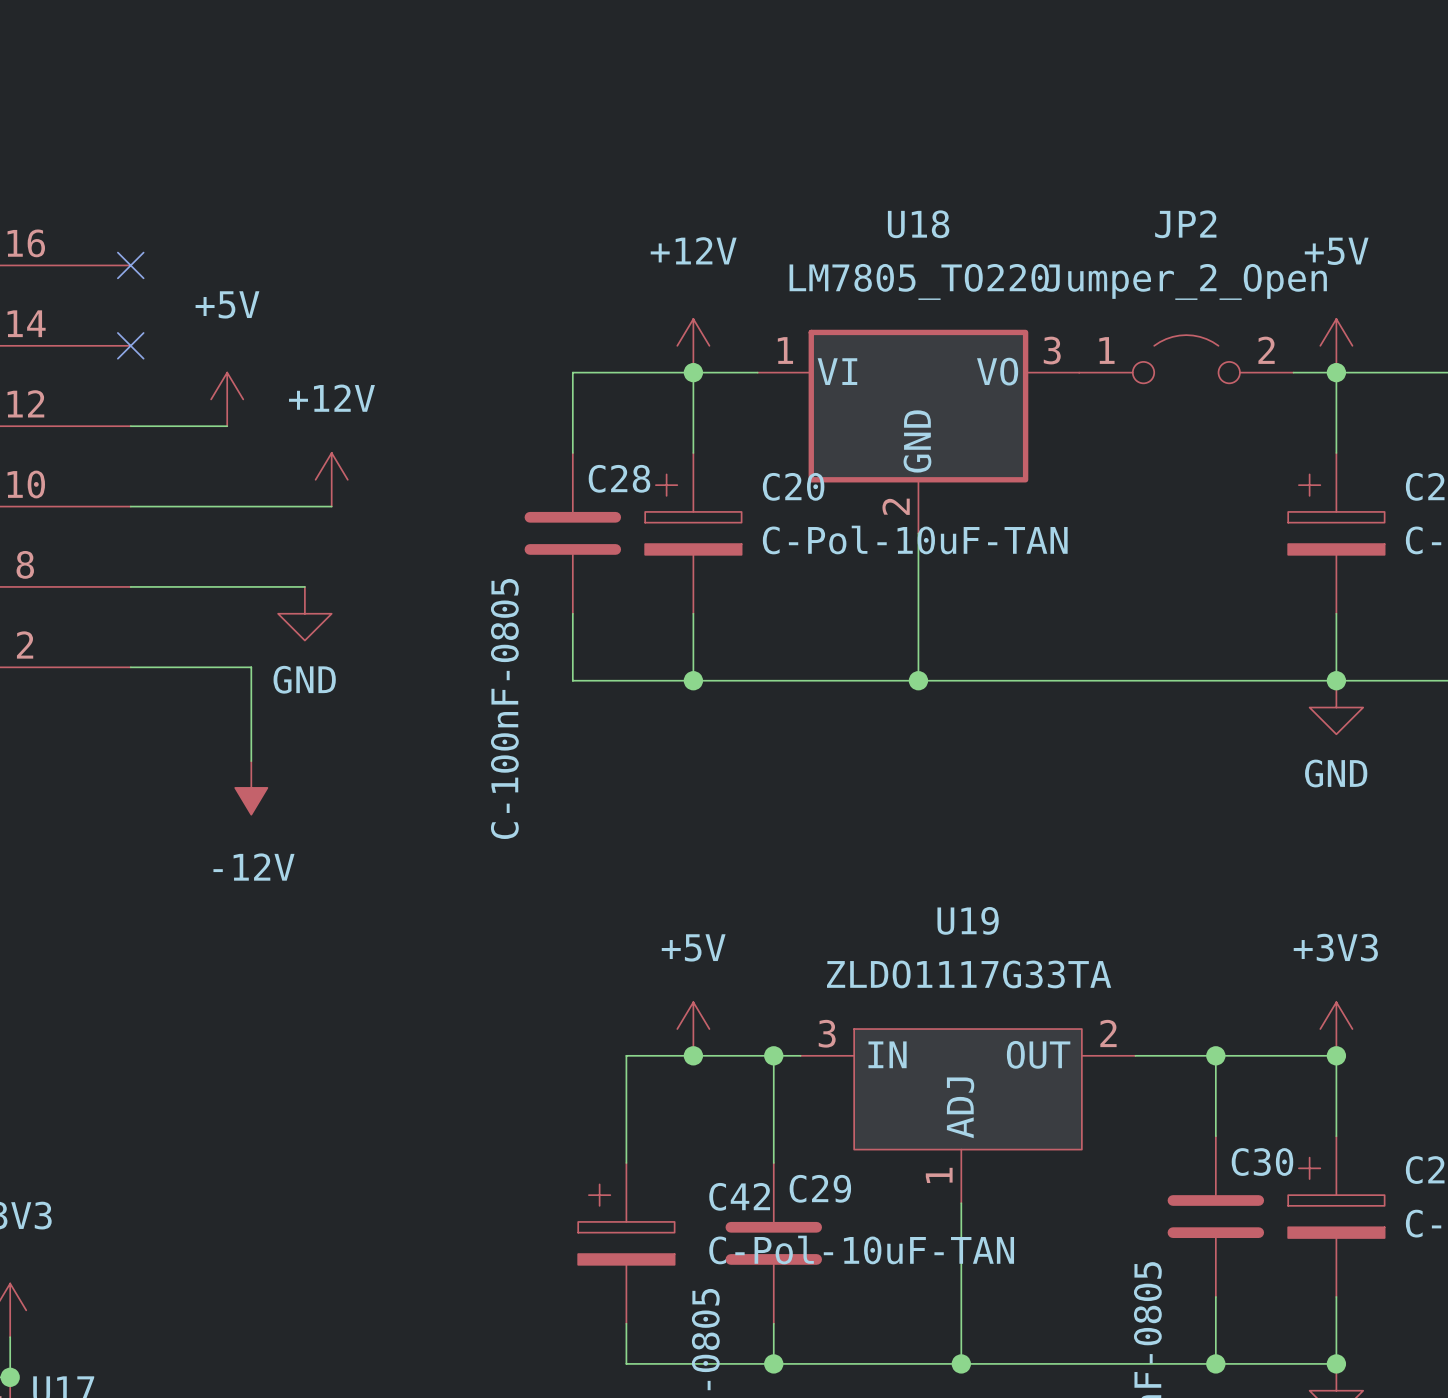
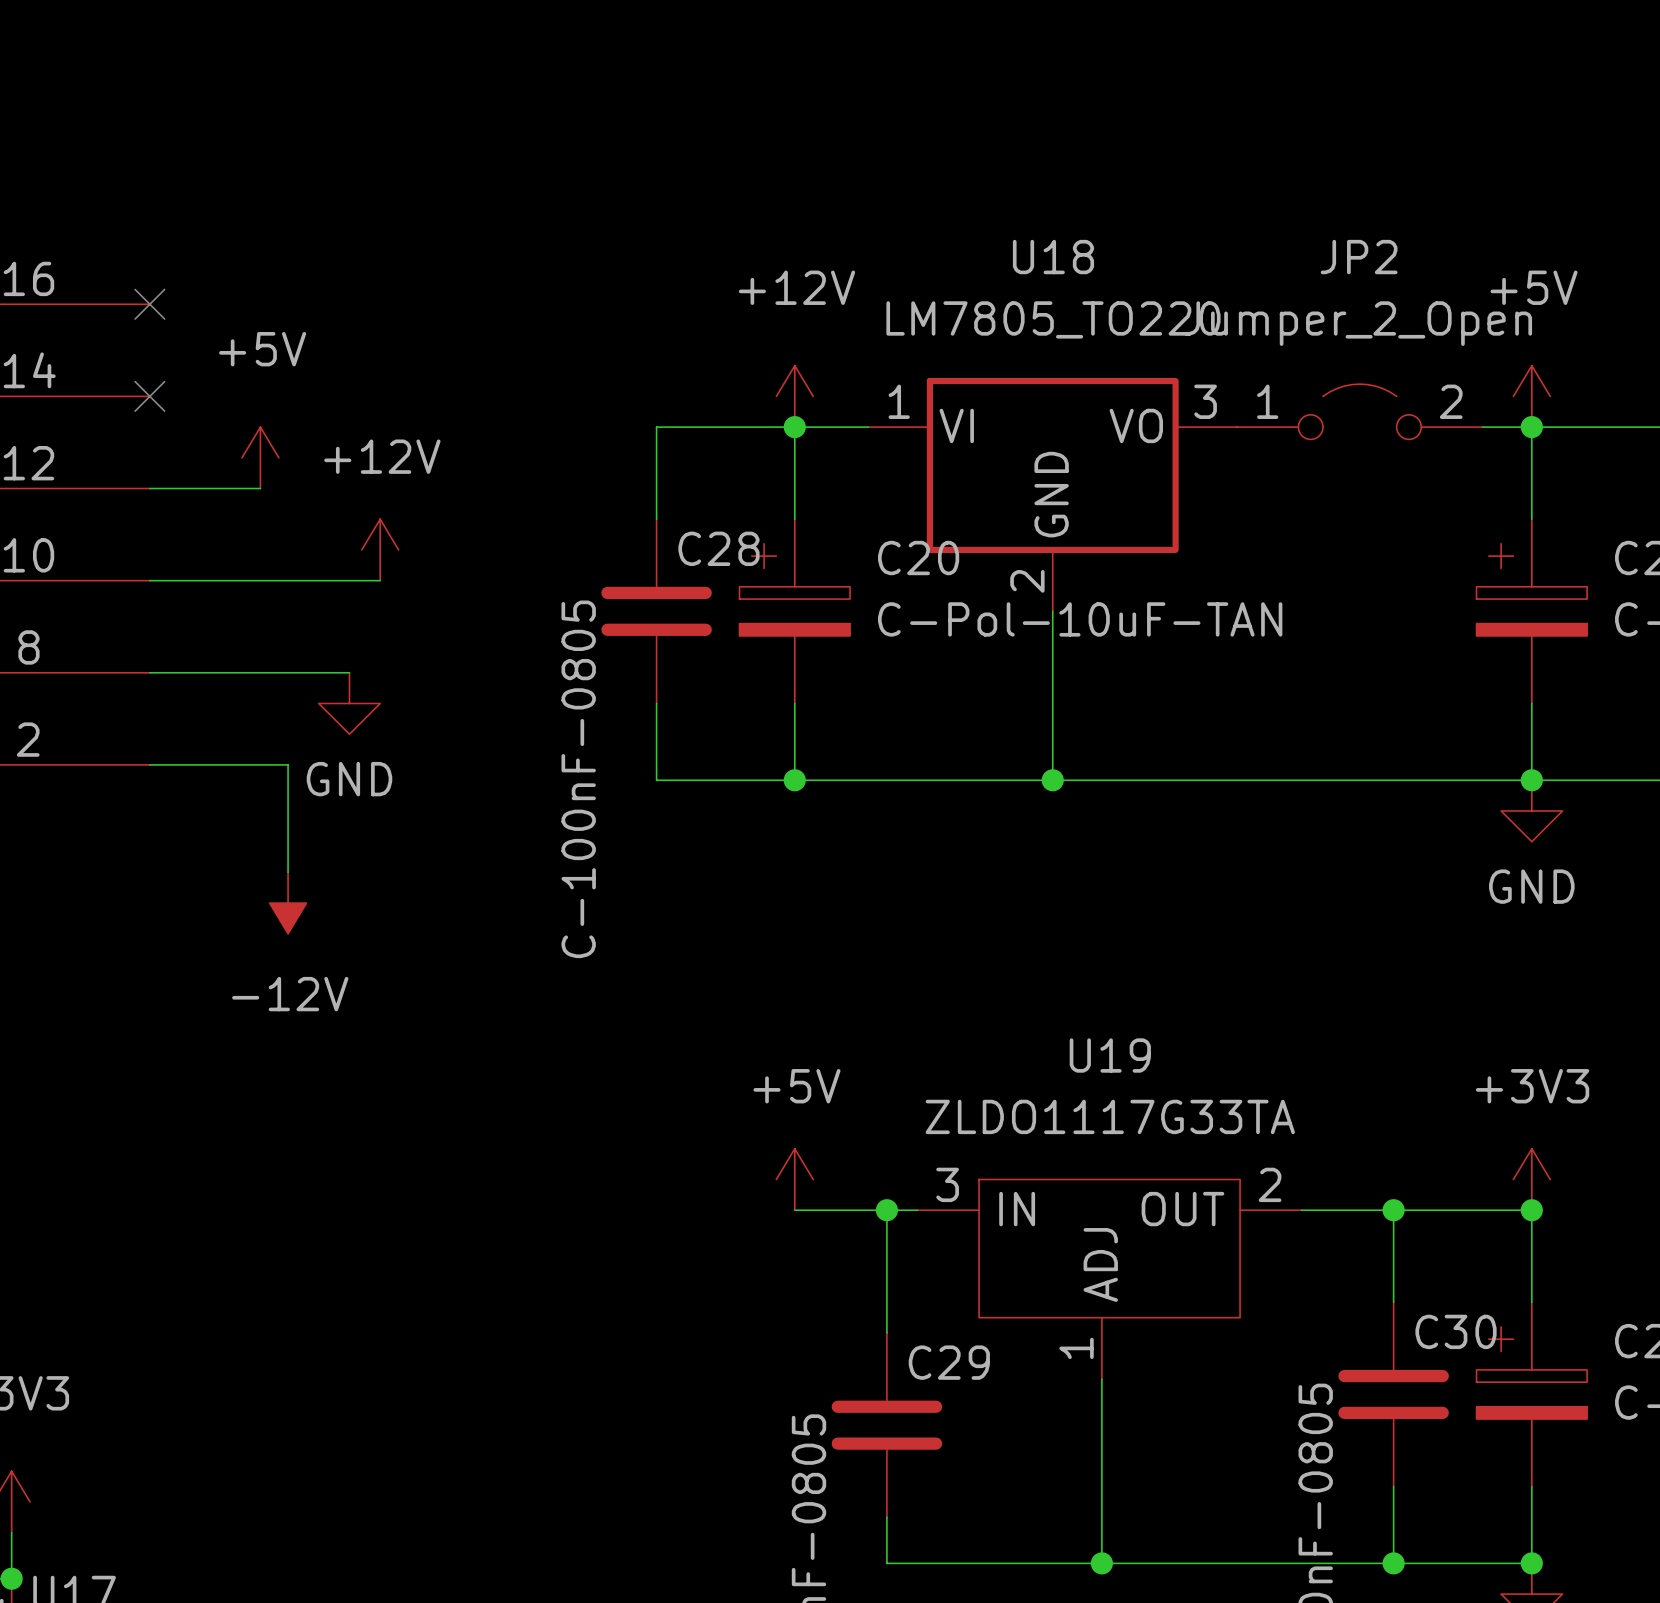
wire: (693, 1055) (626, 1055) (626, 1162) -> none
junction: (693, 1055) -> none
C42: C-Pol-10uF-TAN (626, 1243) -> none
wire: (626, 1323) (626, 1363) (773, 1363) -> none
junction: (773, 1363) -> none

